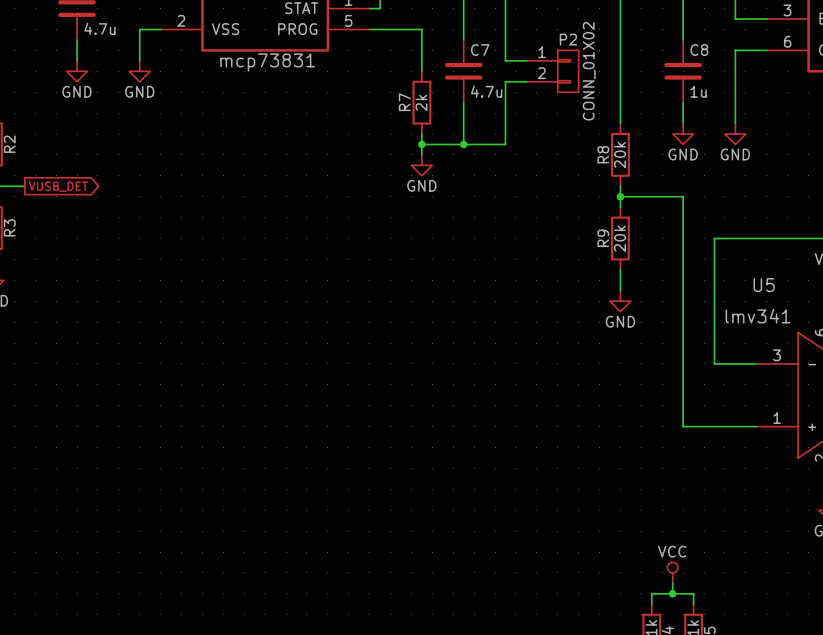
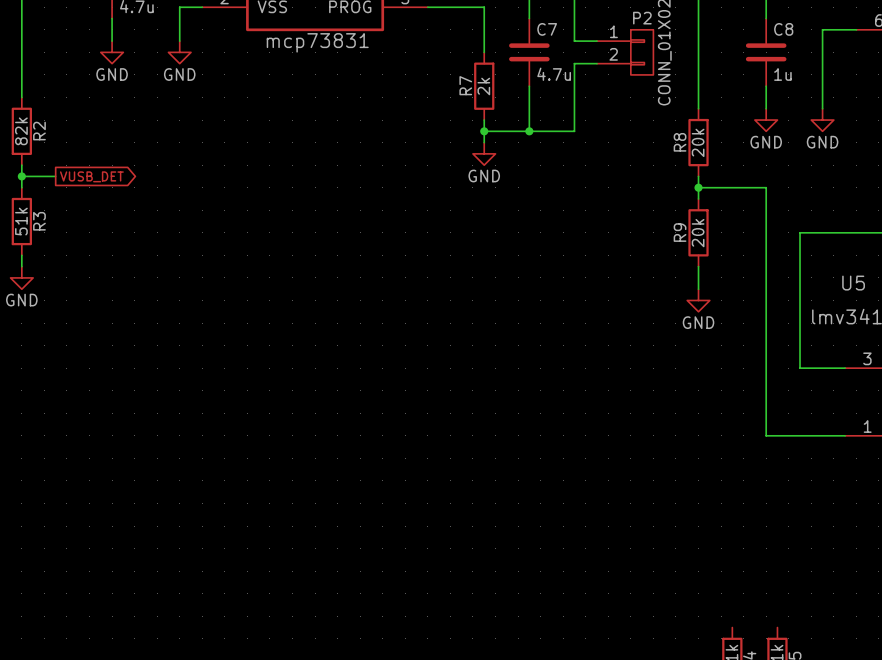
power symbol: VCC (672, 572) -> none
wire: (672, 583) (672, 593) -> none
junction: (672, 593) -> none
wire: (651, 604) (651, 593) (693, 593) (693, 604) -> none

